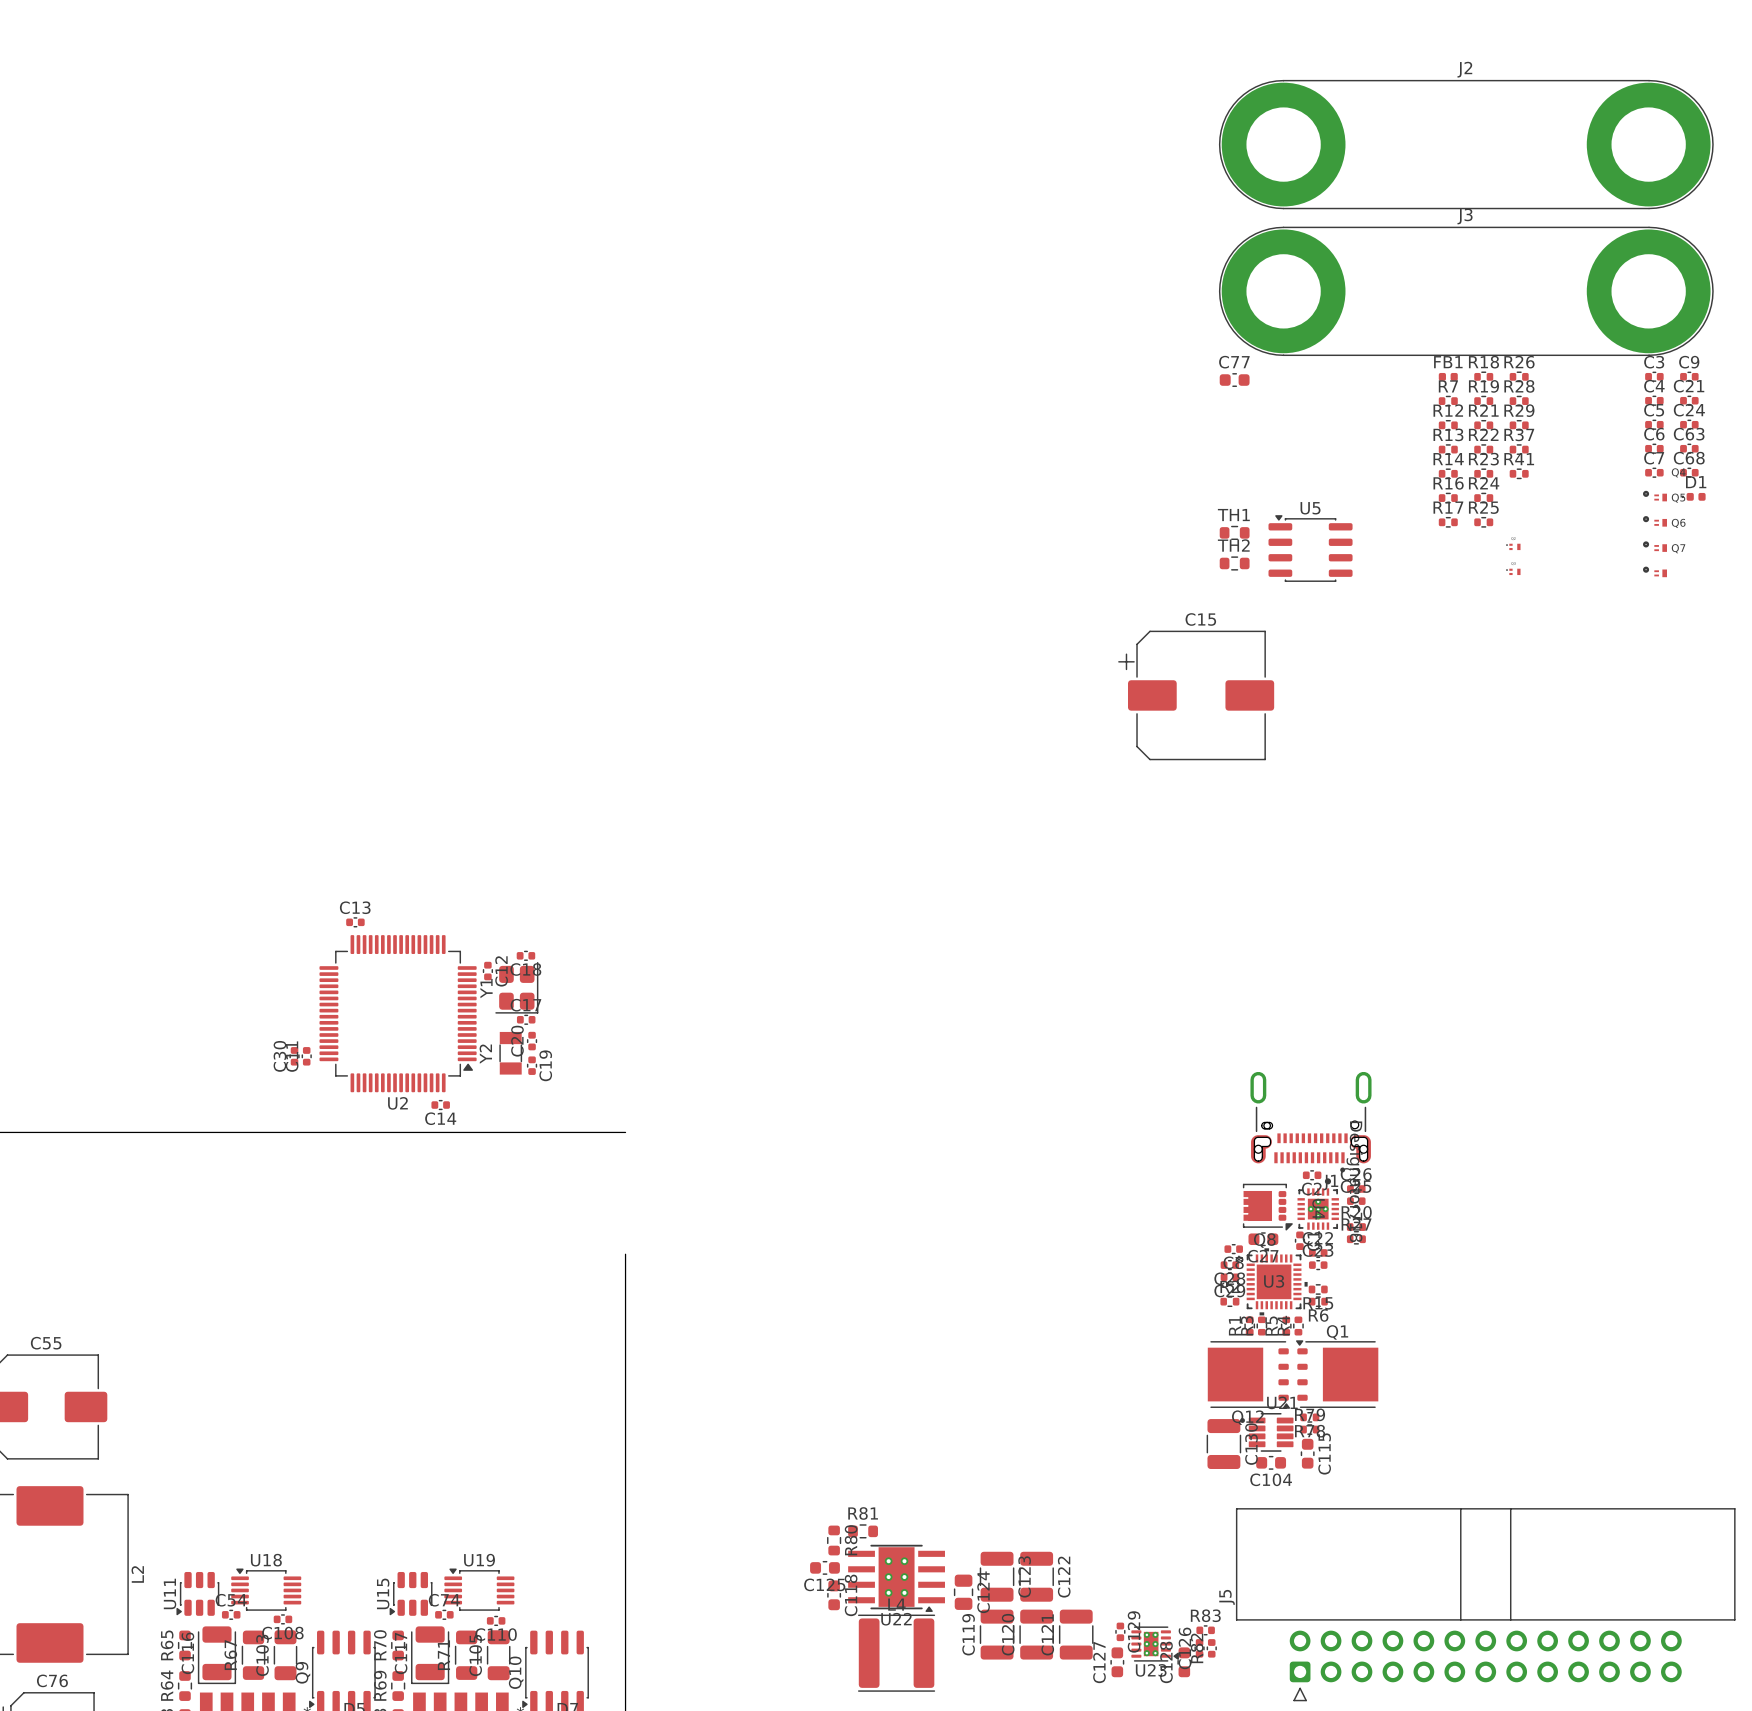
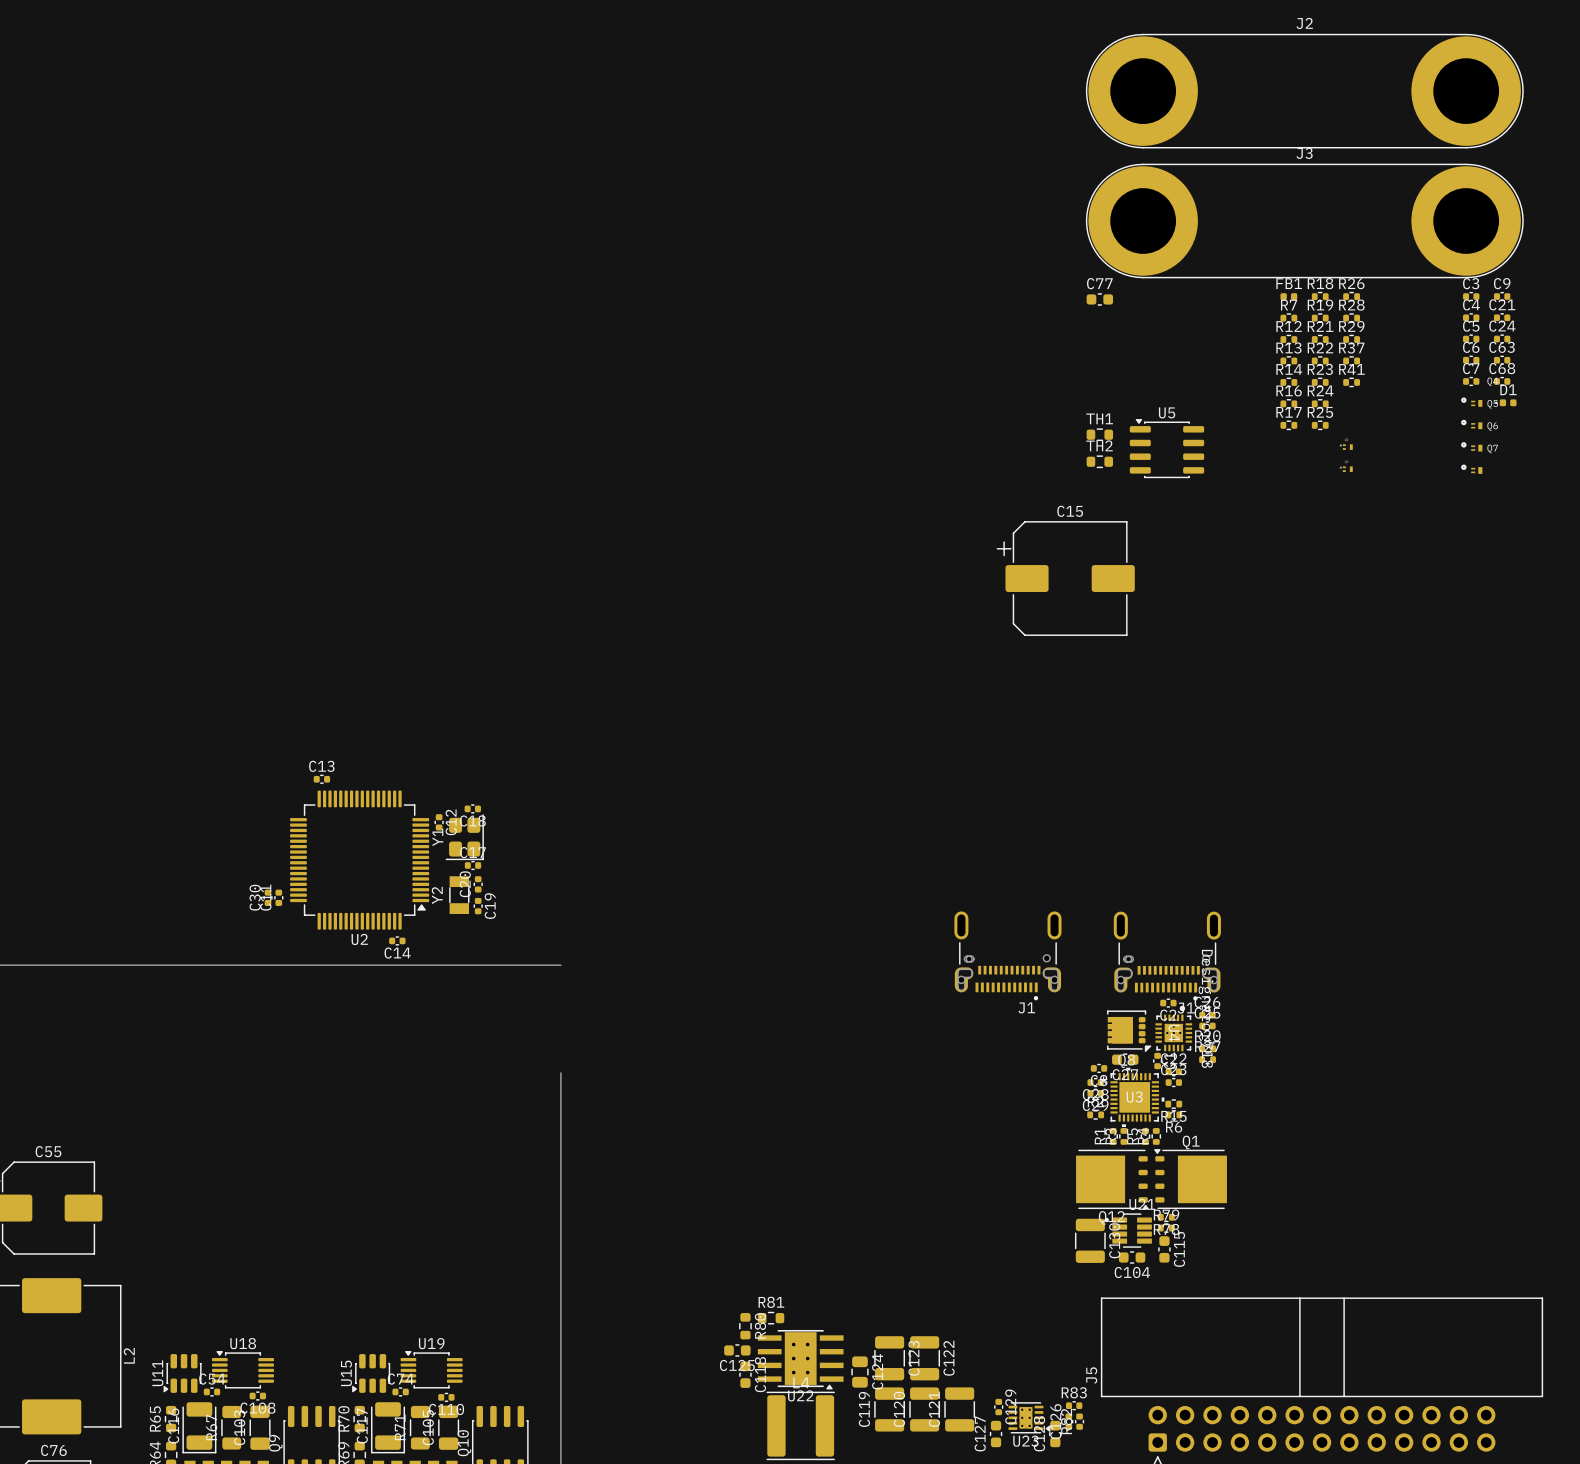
J1: none -> (1007, 955)

